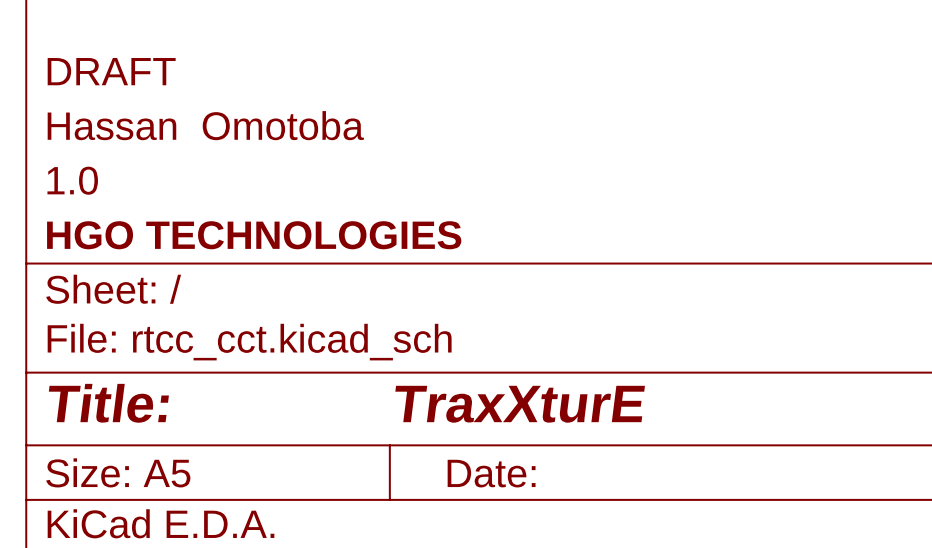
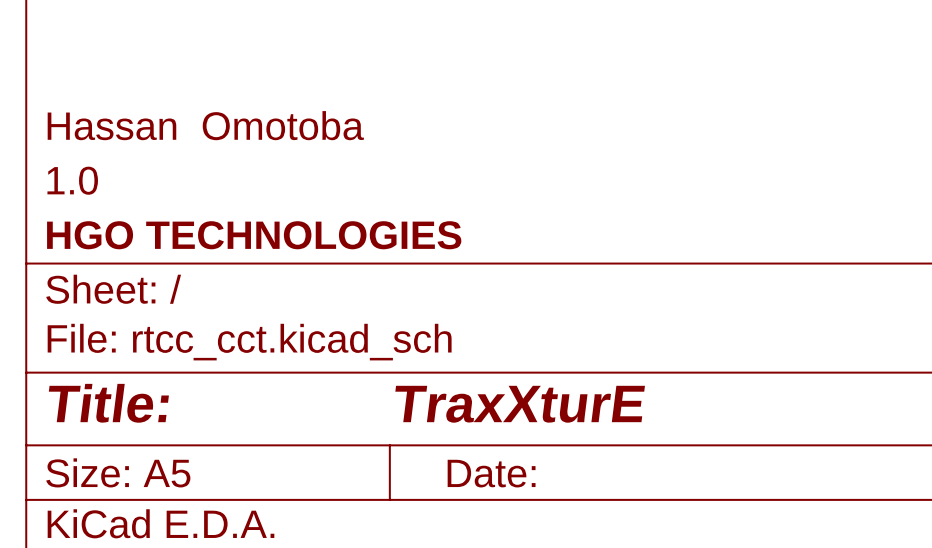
title block: DRAFT (111, 71) -> none

